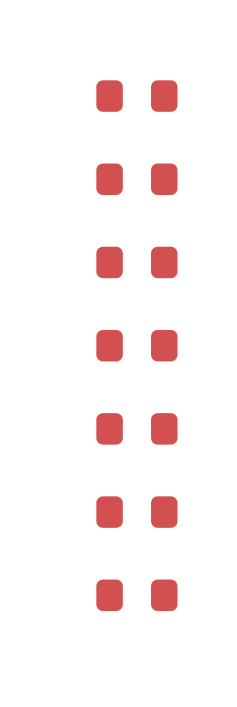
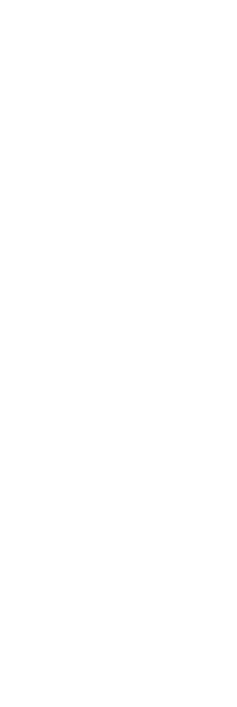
part: (136, 96) -> none
part: (136, 179) -> none
part: (136, 262) -> none
part: (136, 345) -> none
part: (136, 428) -> none
part: (136, 512) -> none
part: (136, 595) -> none

